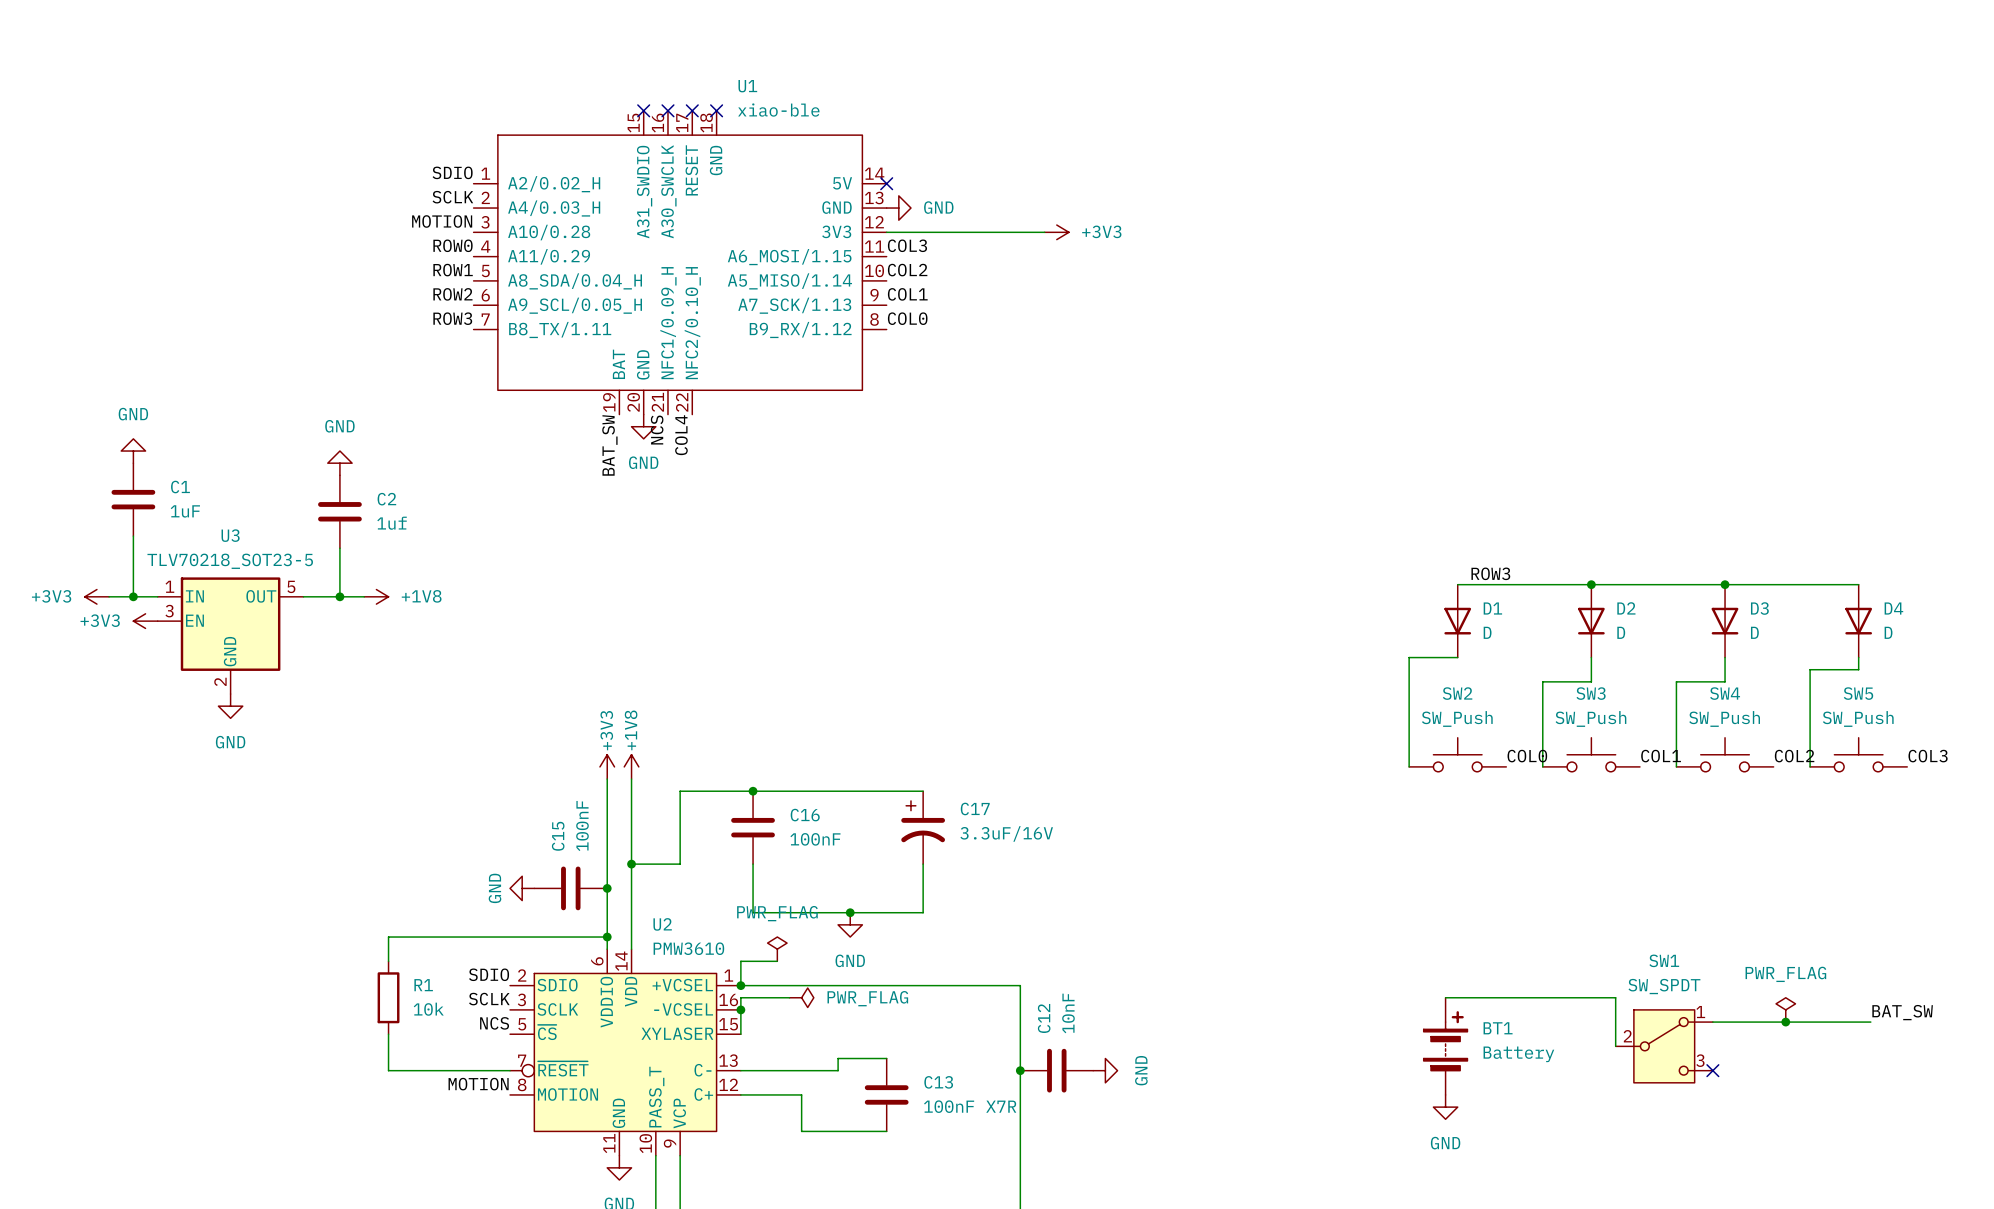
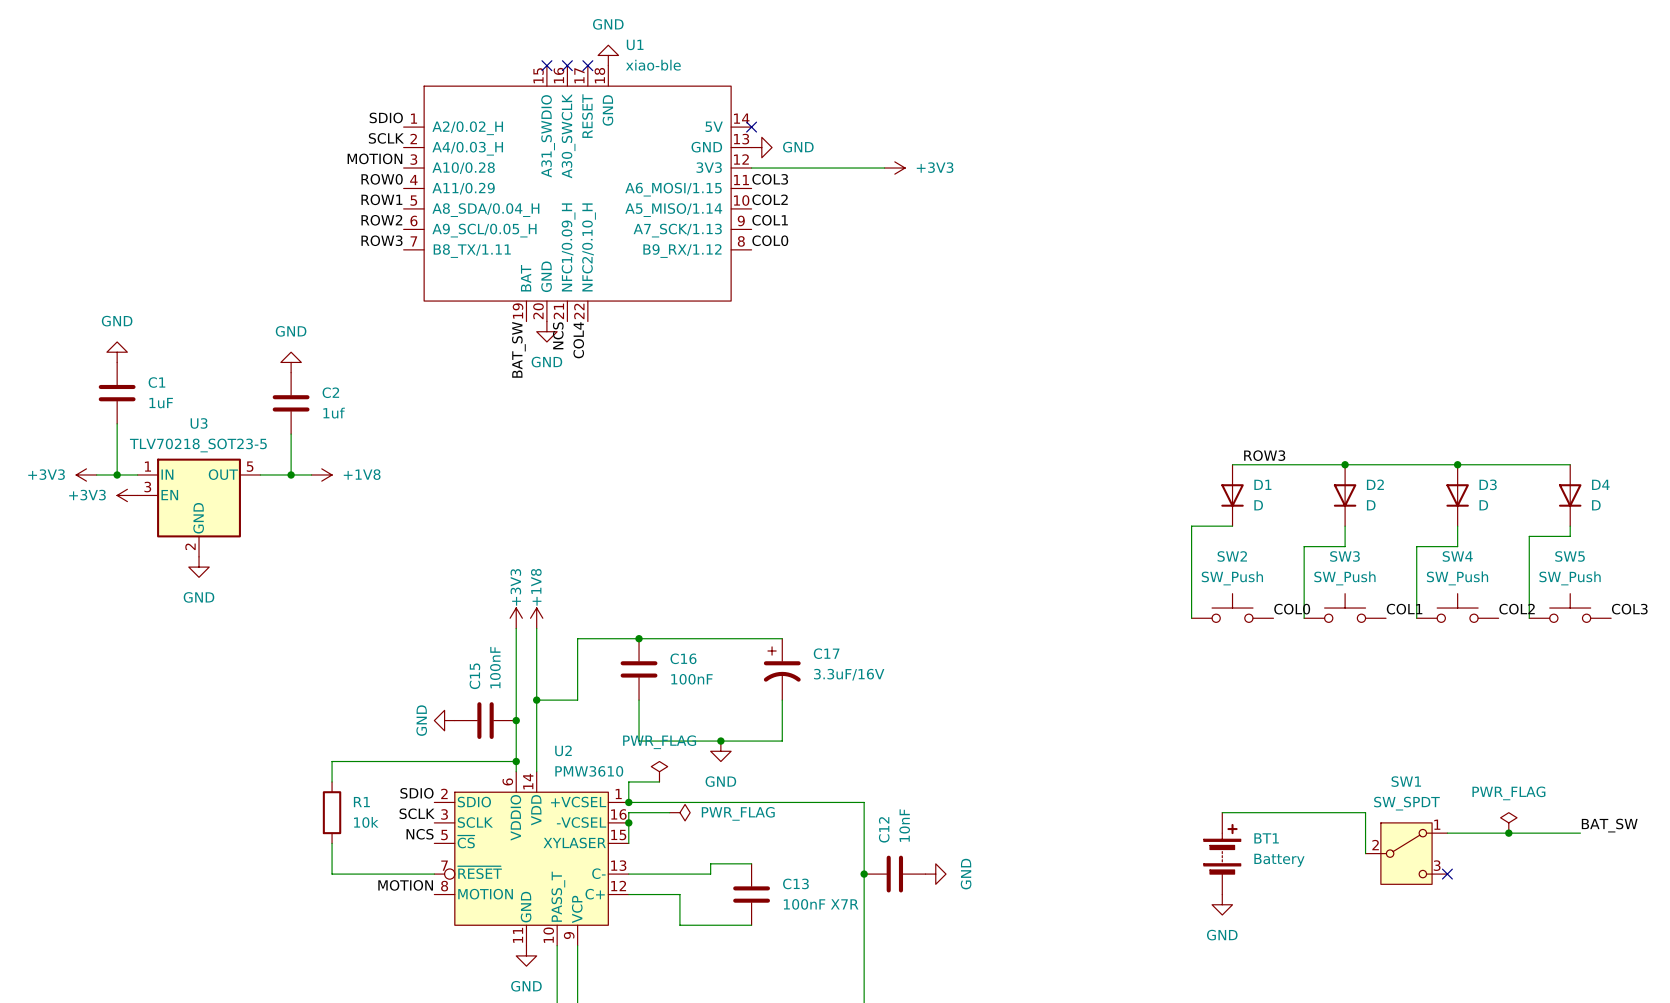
power symbol: none -> GND (608, 55)
no-connect mark: (716, 110) -> none

